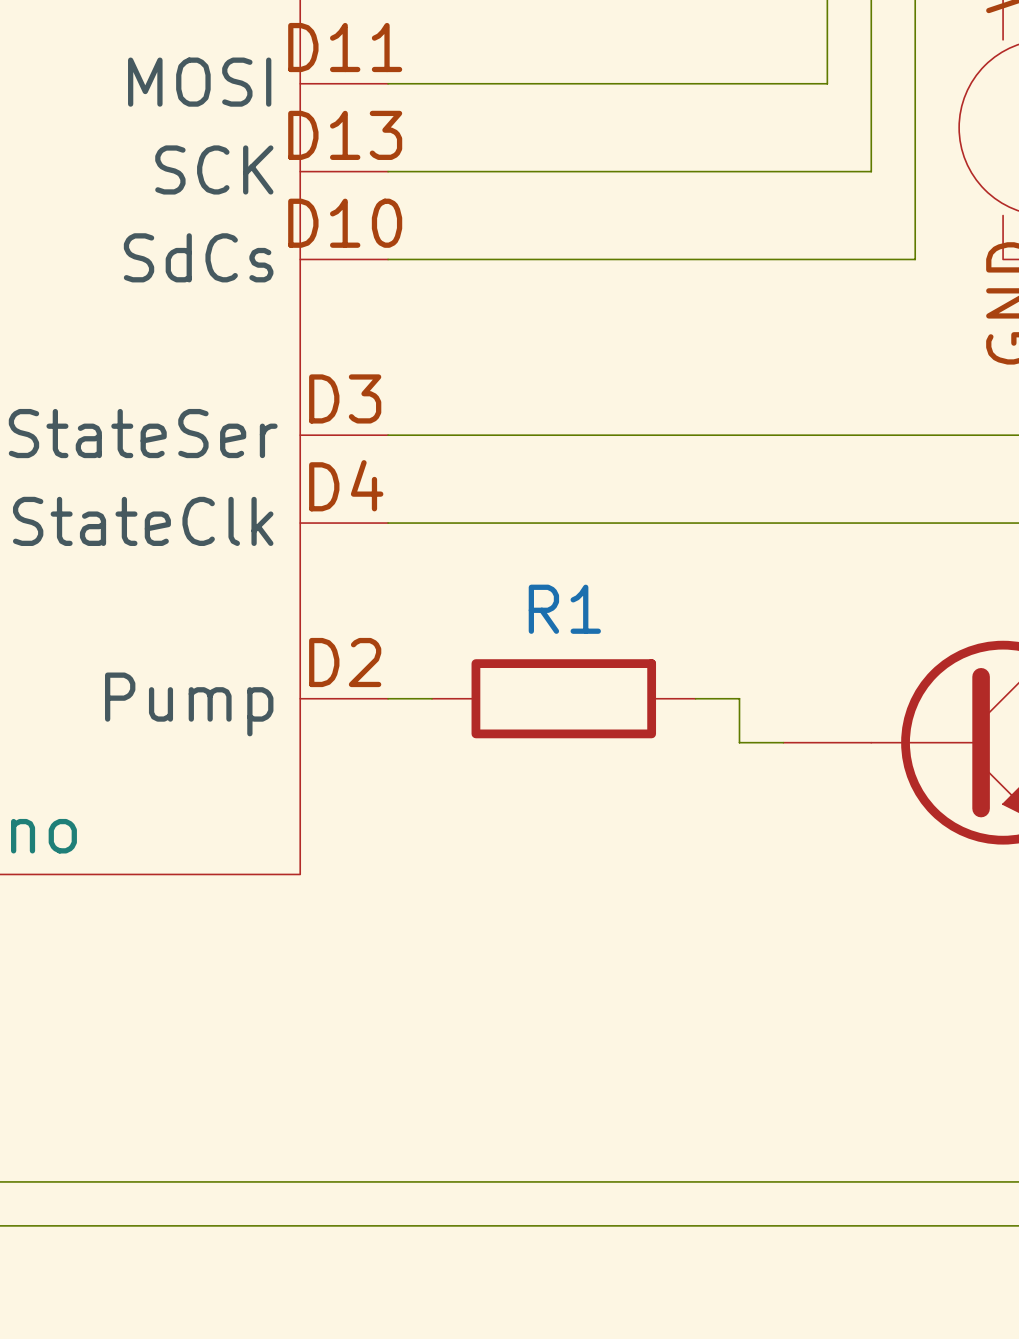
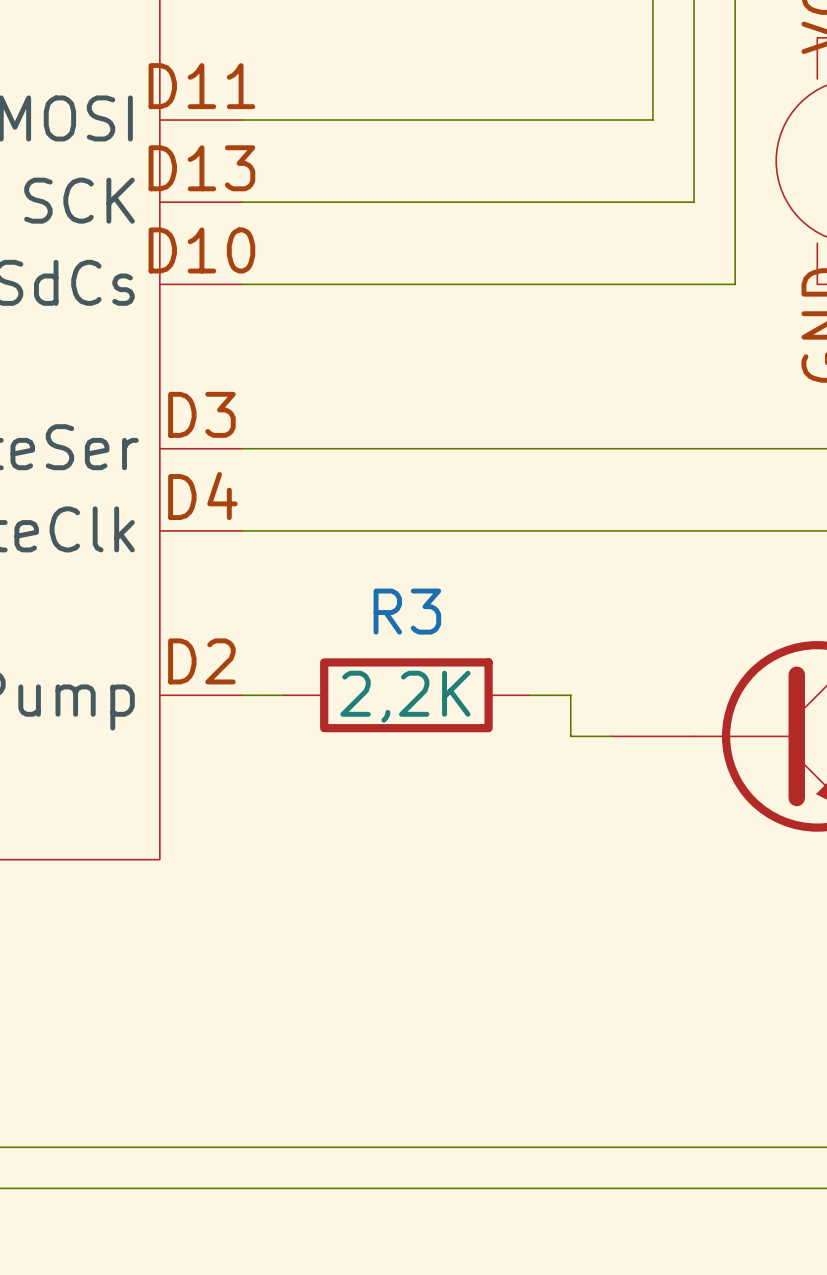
R1 name: R1 (564, 609) -> R3 (407, 611)
R1 value: none -> 2,2K (405, 696)

